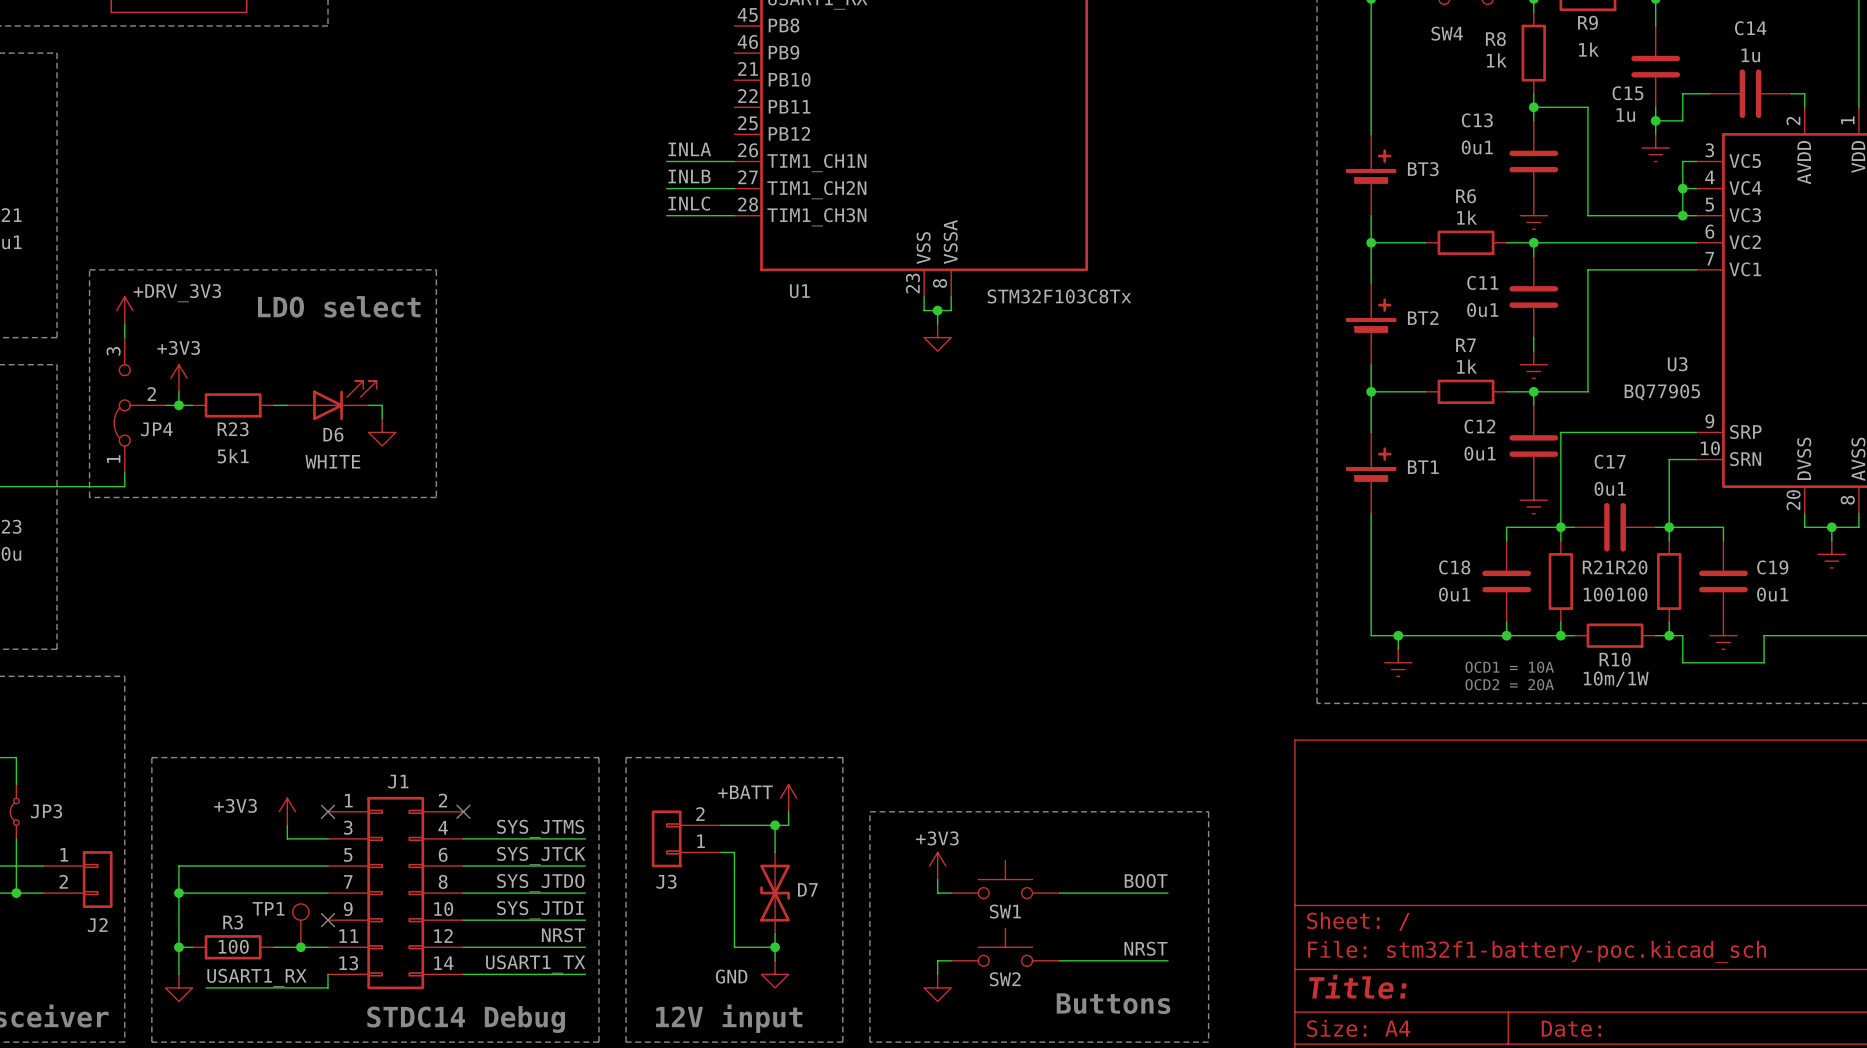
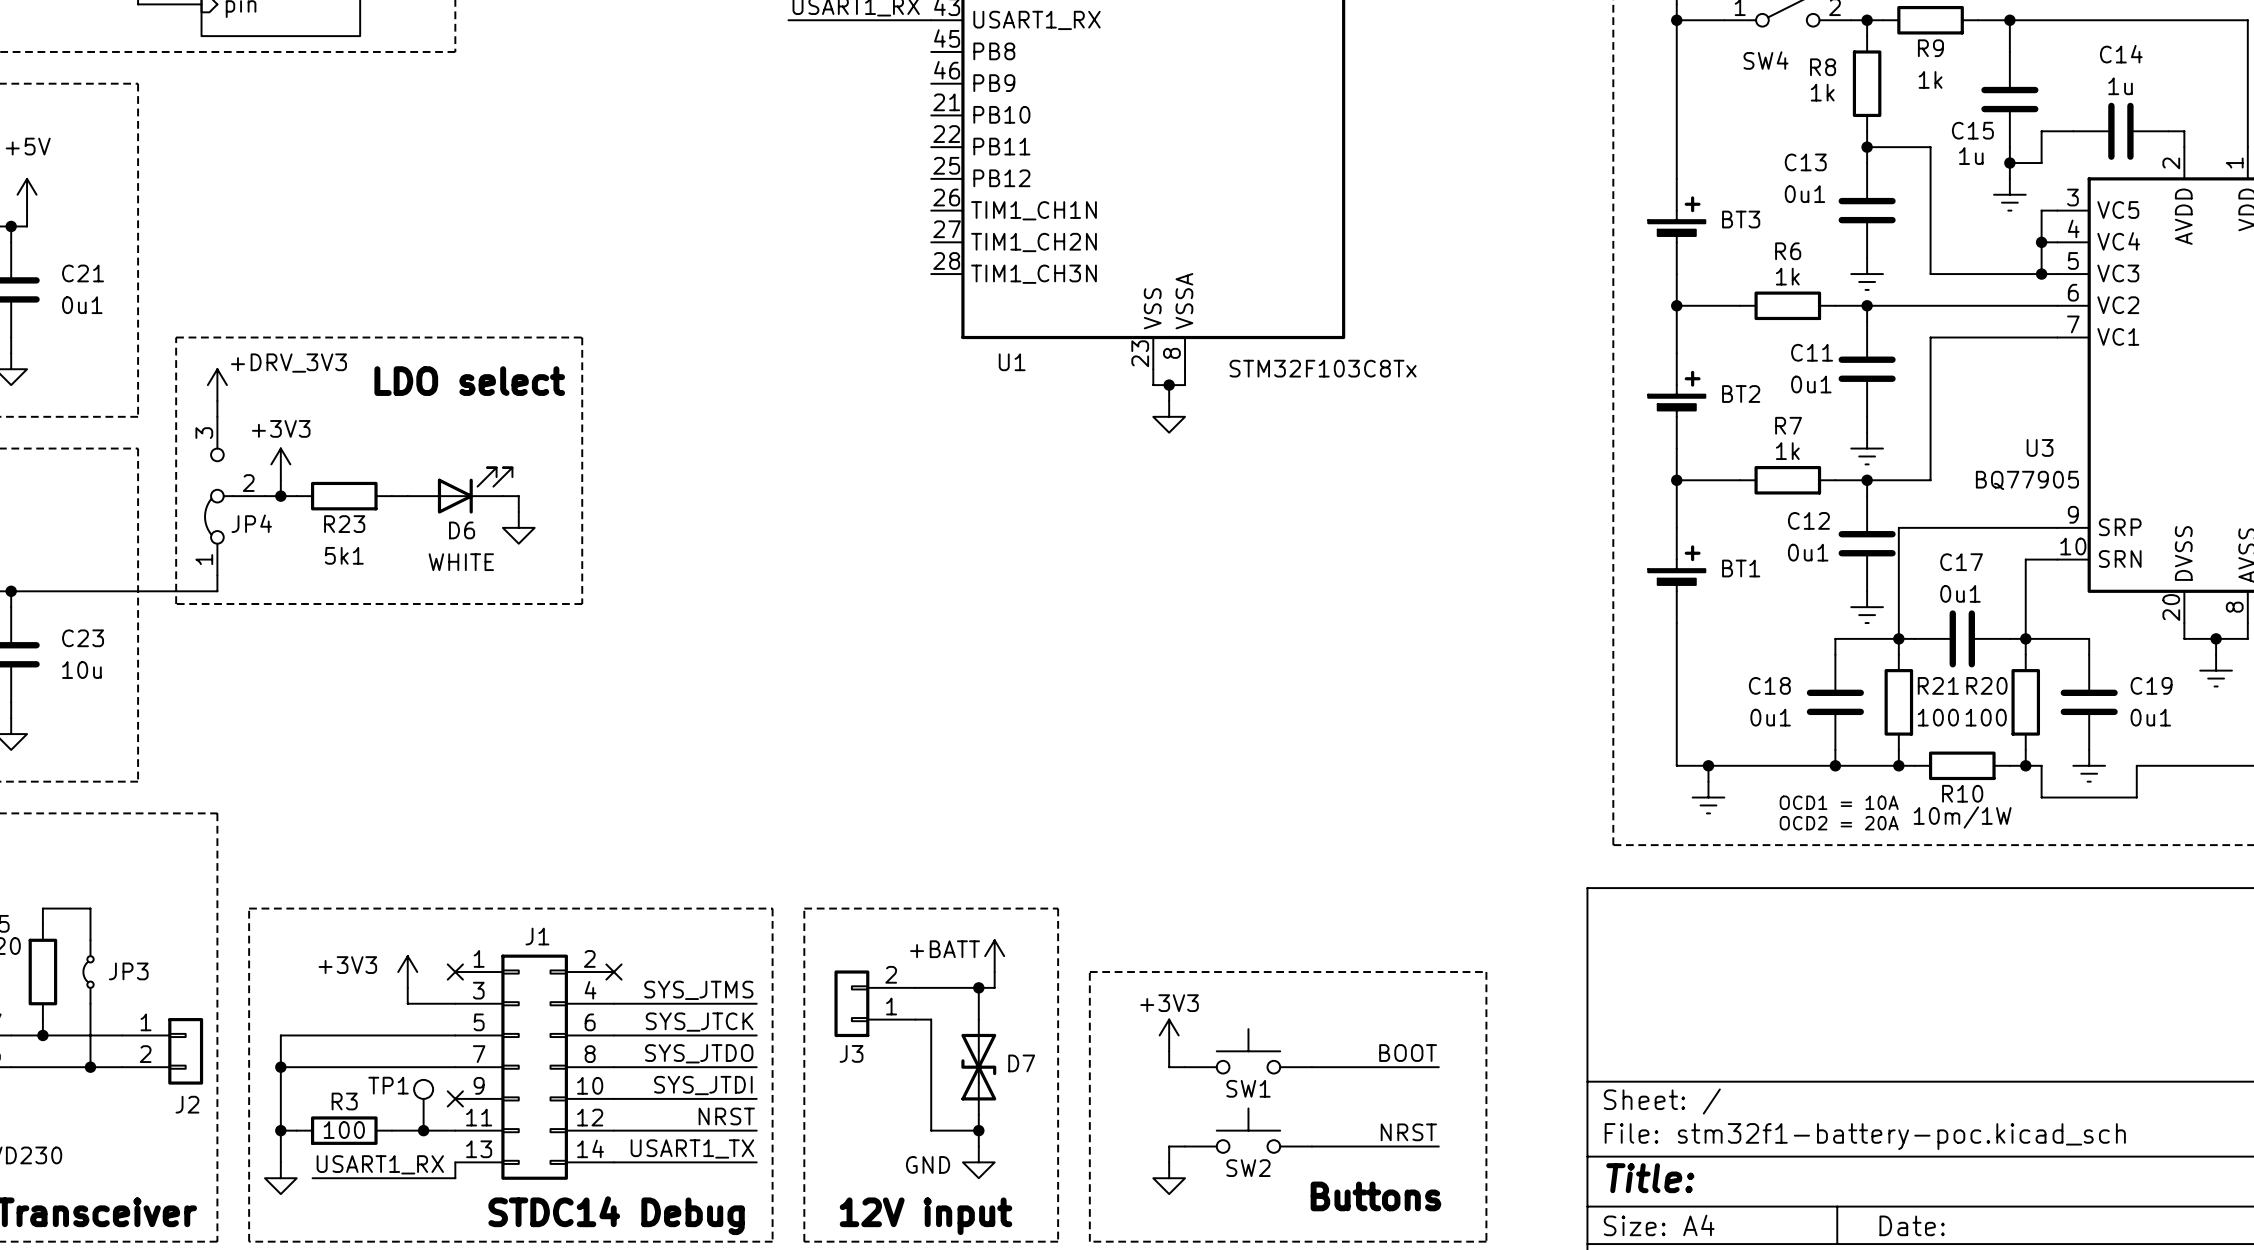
label: INLA (689, 149) -> none
wire: (666, 161) (734, 161) -> none
label: INLB (689, 176) -> none
wire: (666, 188) (734, 188) -> none
label: INLC (689, 203) -> none
wire: (666, 215) (734, 215) -> none

